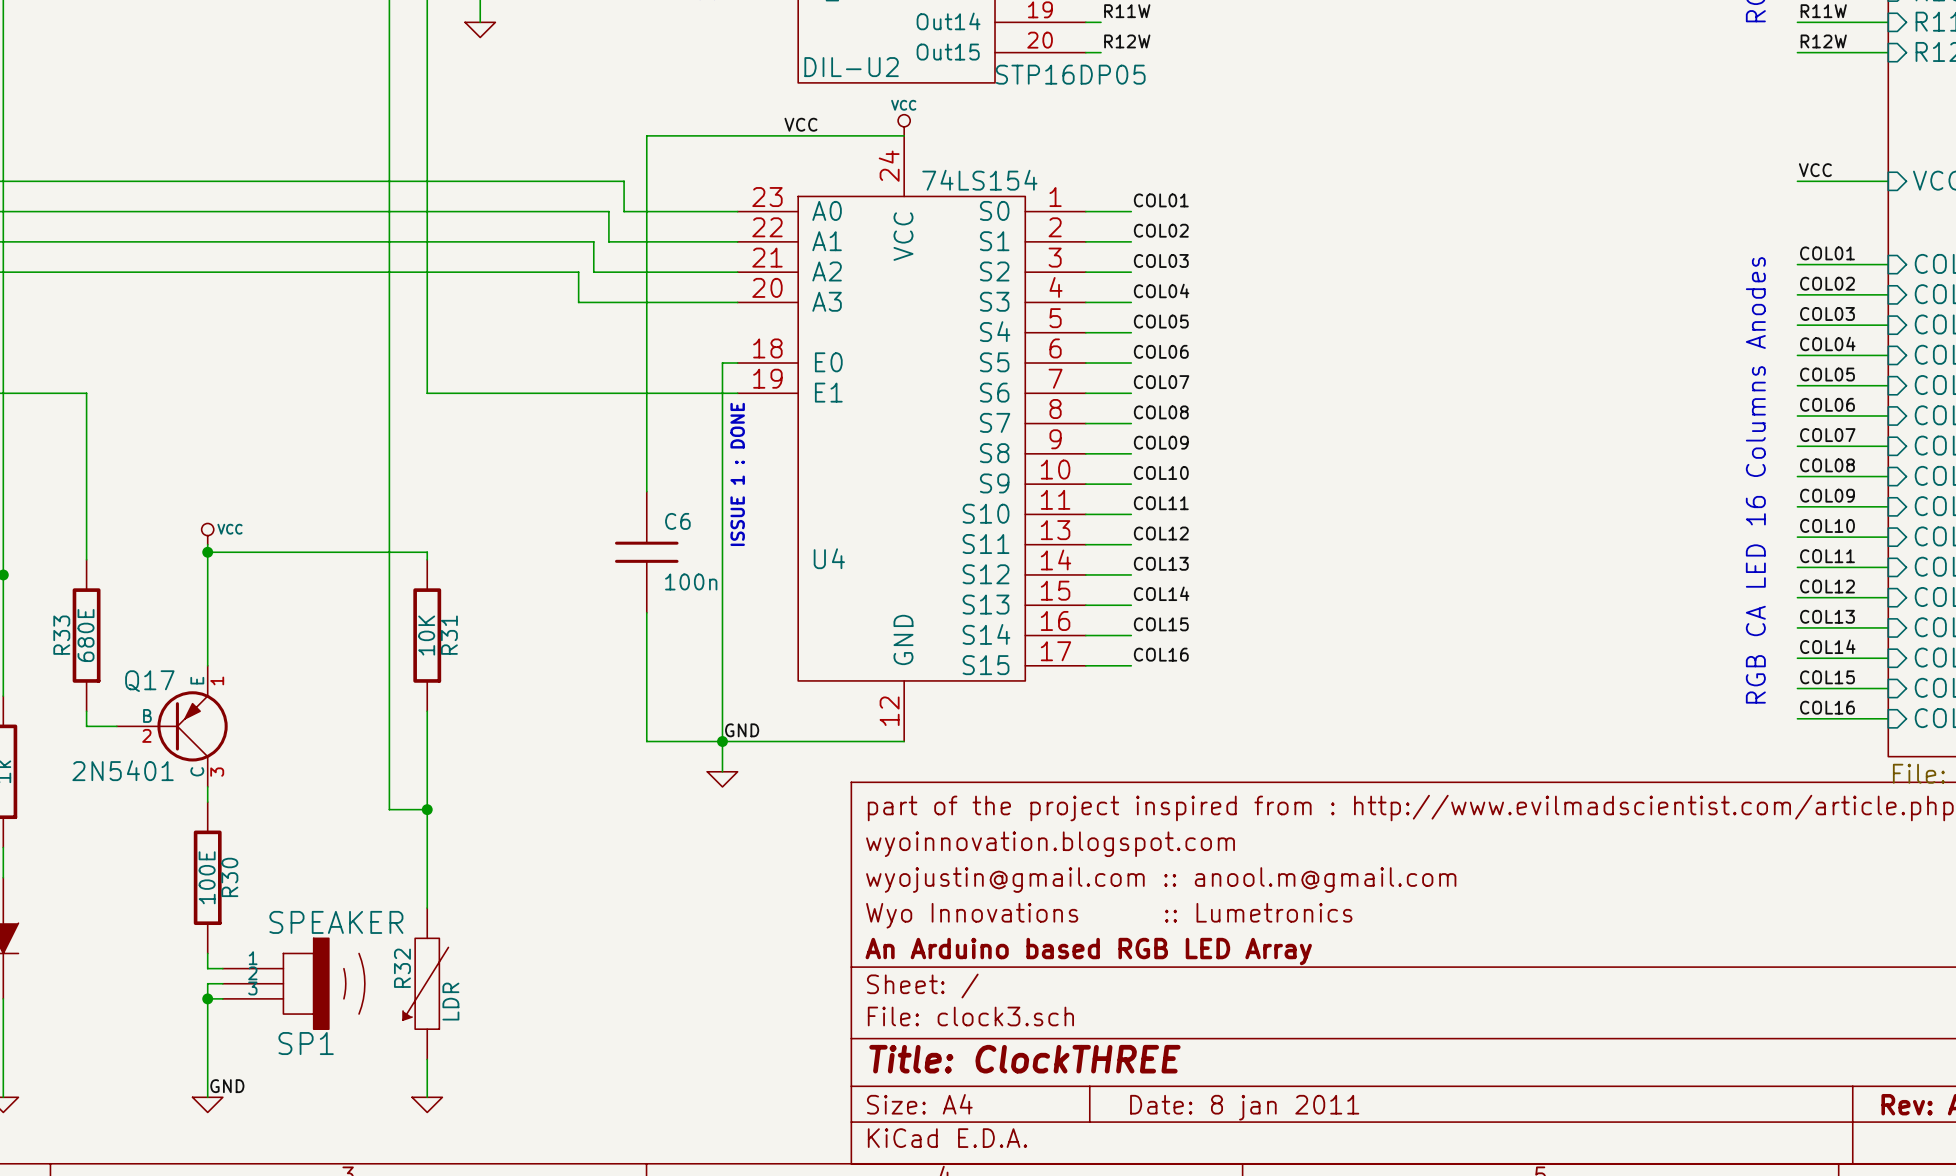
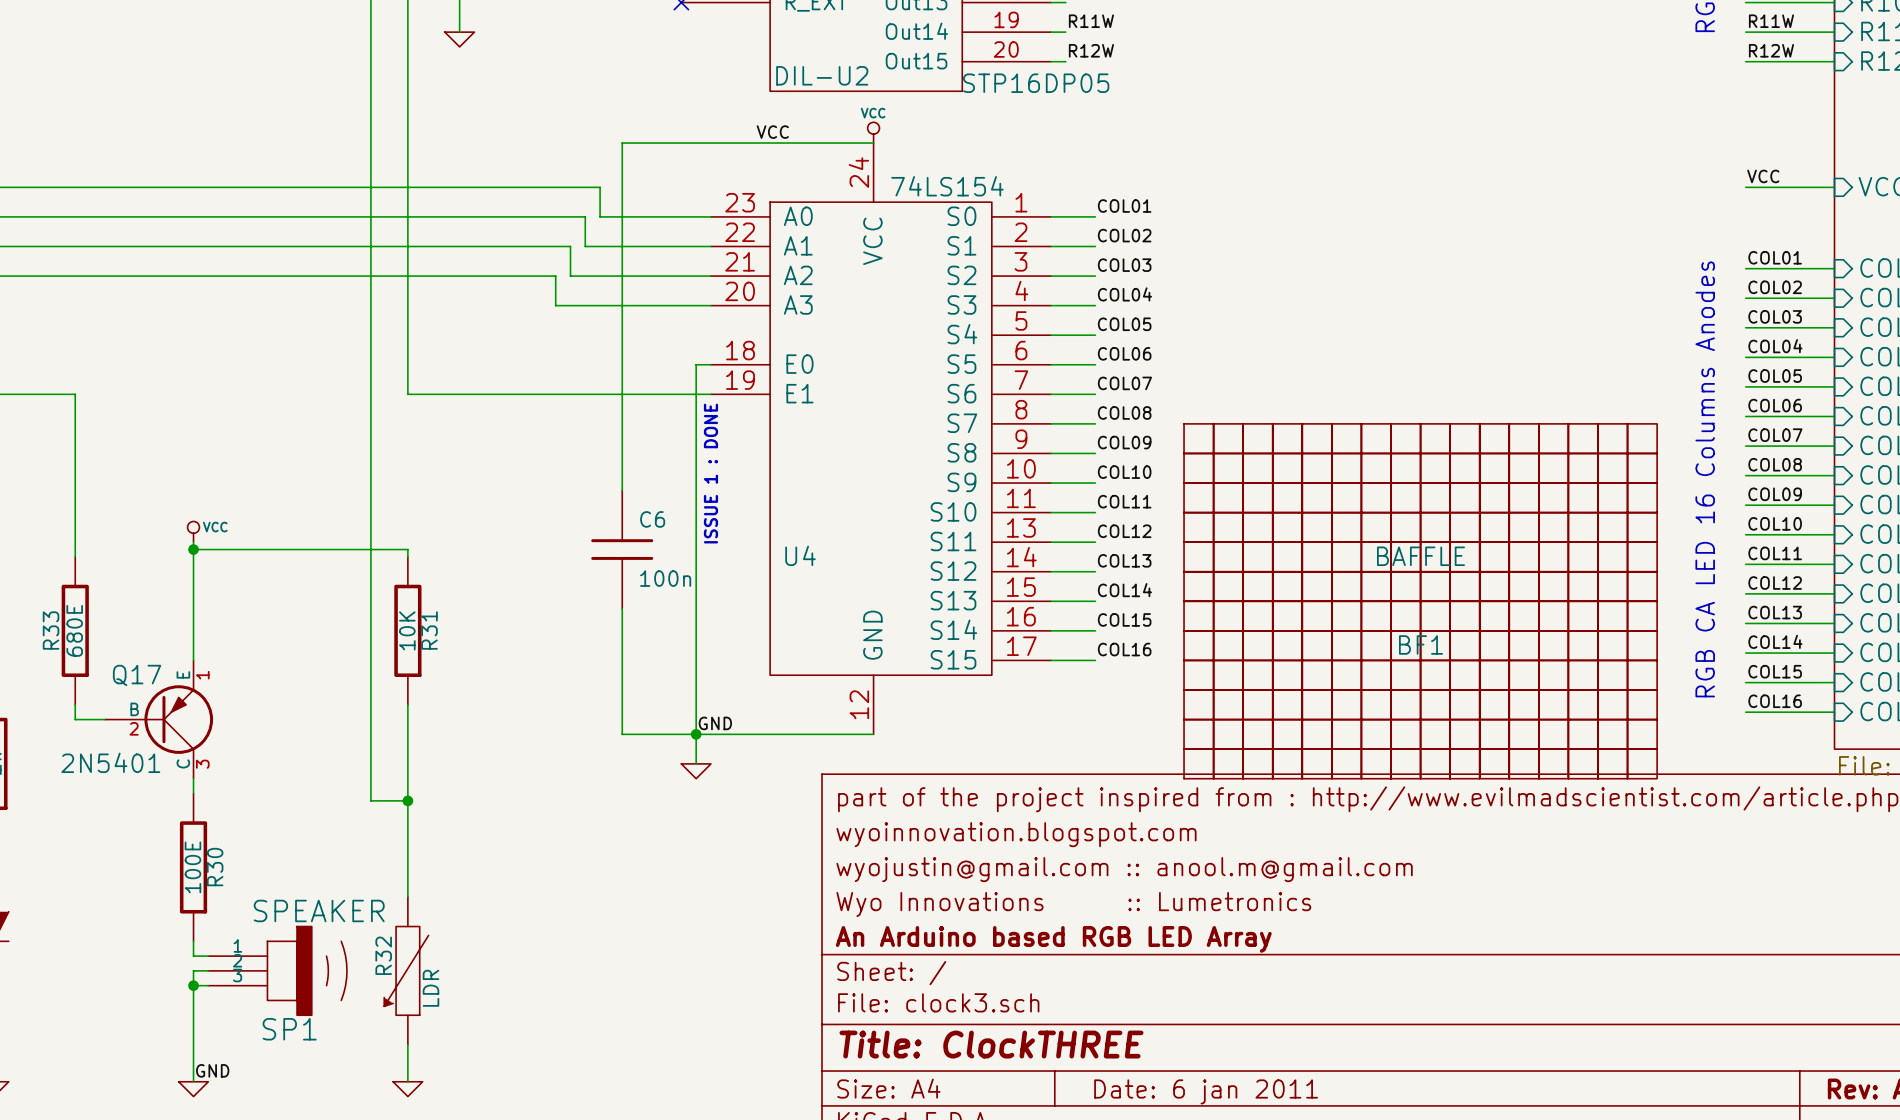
BF1: none -> BAFFLE (1420, 601)
title block: Date: 8 jan 2011 (1244, 1107) -> Date: 6 jan 2011 (1206, 1091)

